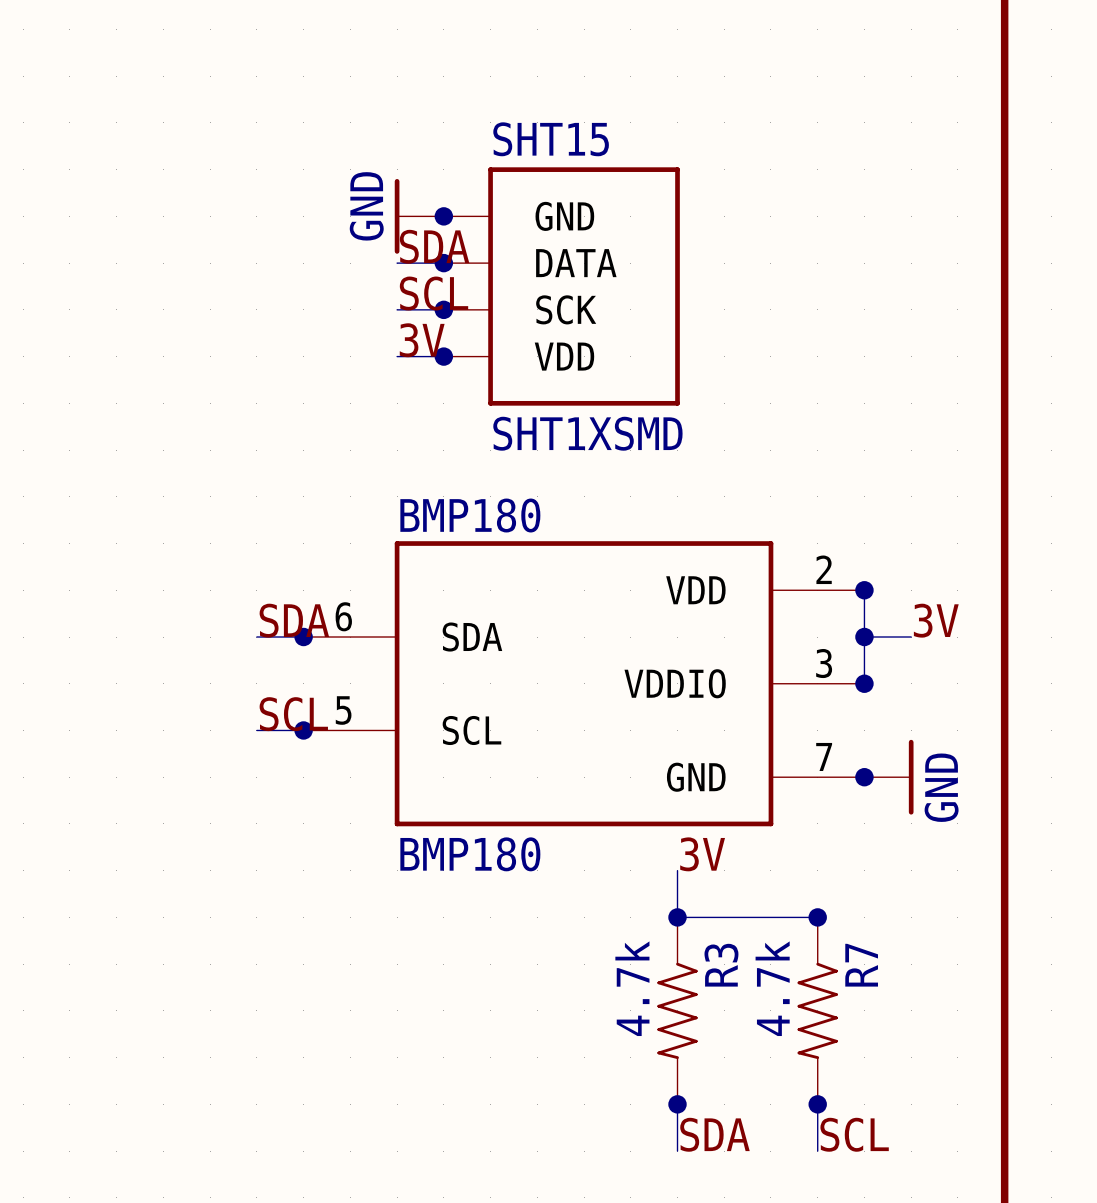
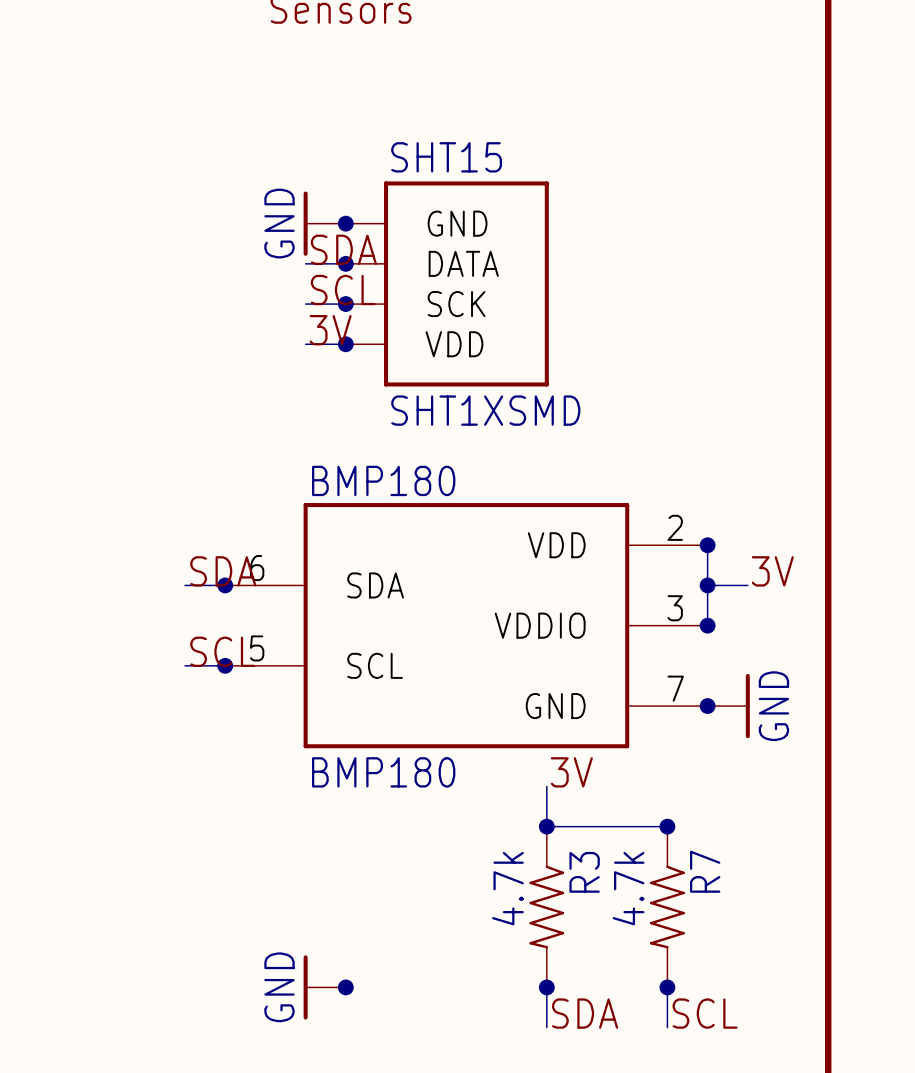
power symbol: none -> GND (324, 987)
junction: none -> (345, 987)

